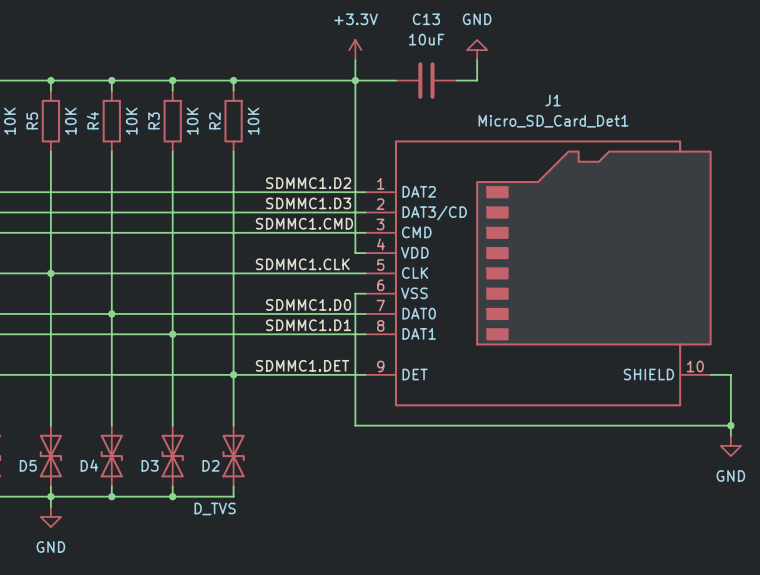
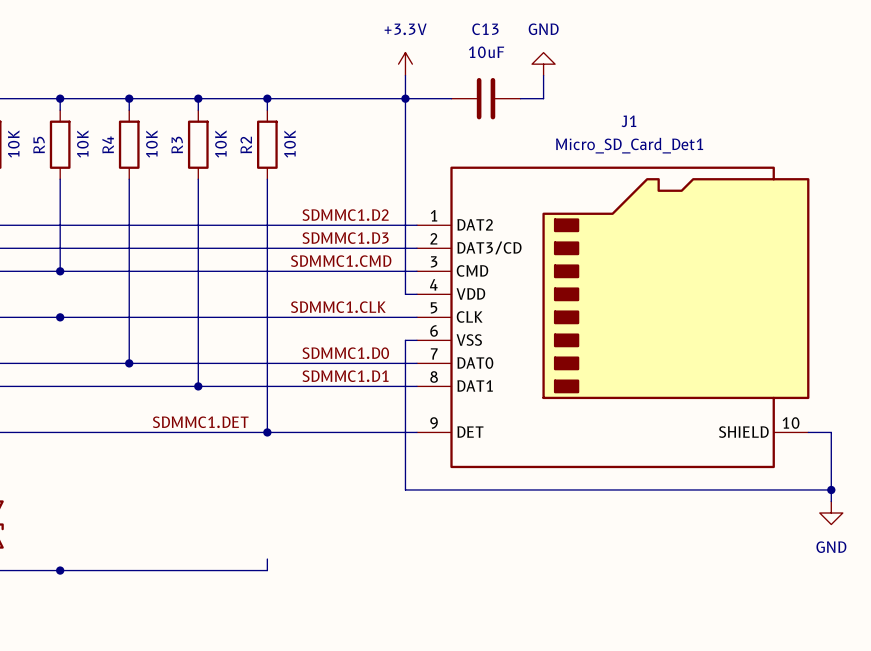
wire: (50, 232) (50, 425) -> none
junction: none -> (60, 271)
wire: (111, 313) (111, 425) -> none
wire: (172, 334) (172, 425) -> none
label position: SDMMC1.DET (302, 365) -> SDMMC1.DET (200, 422)
wire: (233, 374) (233, 425) -> none
D5: (50, 456) -> none
D4: (111, 456) -> none
D3: (172, 456) -> none
D2: D_TVS (233, 456) -> none
wire: (50, 486) (50, 506) -> none
wire: (111, 486) (111, 496) -> none
wire: (172, 486) (172, 496) -> none
junction: (111, 496) -> none
junction: (172, 496) -> none
power symbol: GND (50, 516) -> none

